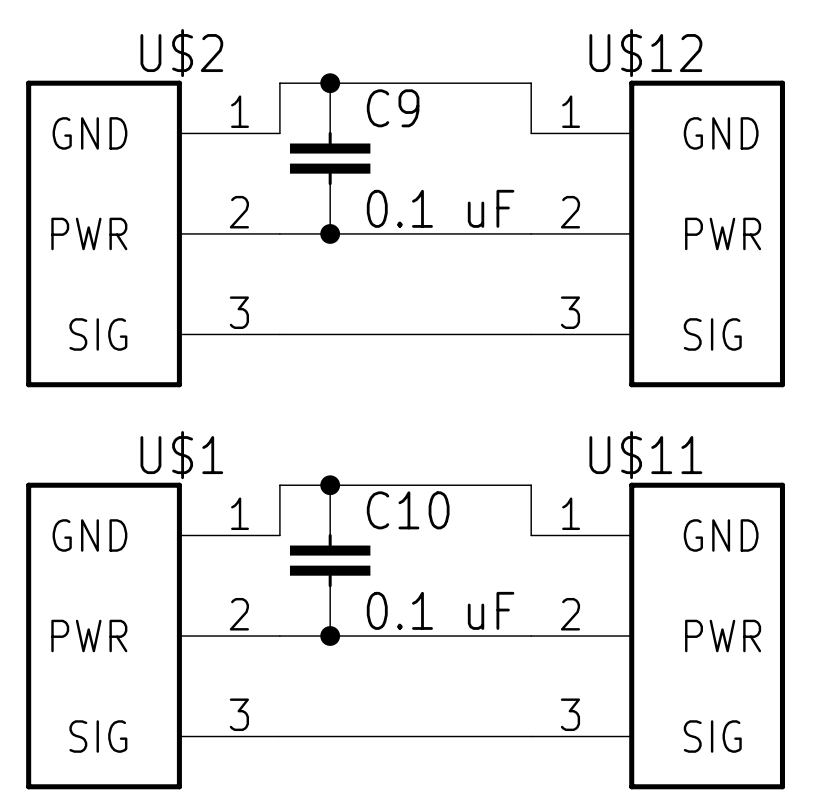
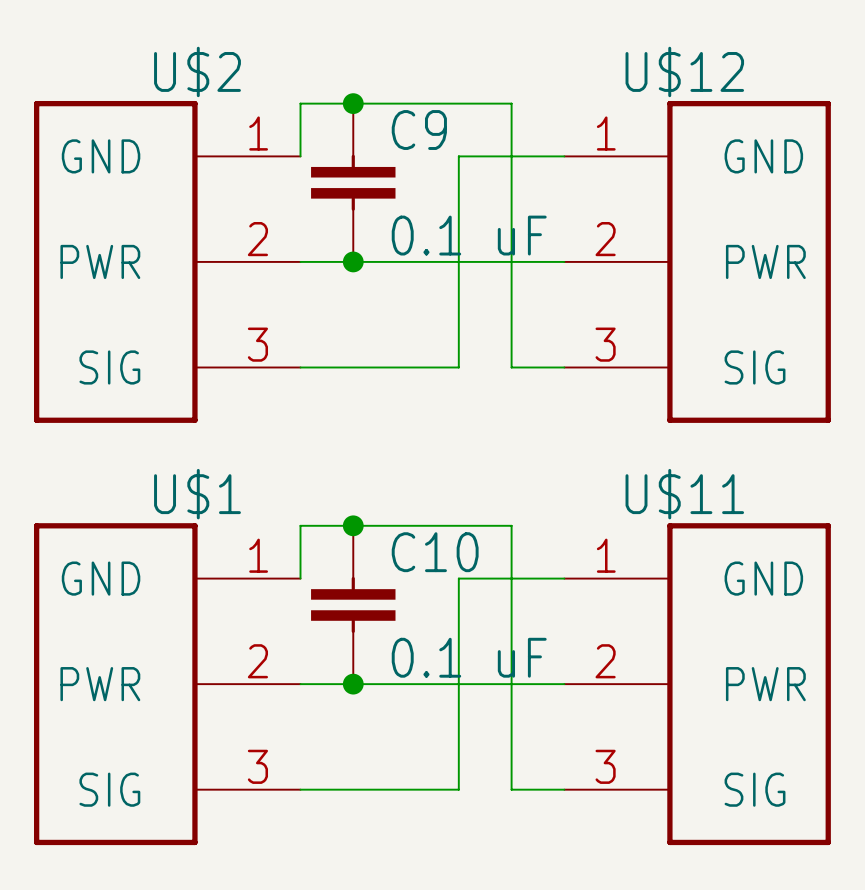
wire: (480, 83) (531, 83) (531, 133) -> (511, 103) (511, 367)
wire: (430, 334) (480, 334) -> (458, 367) (458, 156) (564, 156)
wire: (480, 485) (531, 485) (531, 535) -> (511, 525) (511, 789)
wire: (430, 736) (480, 736) -> (458, 789) (458, 578) (564, 578)

